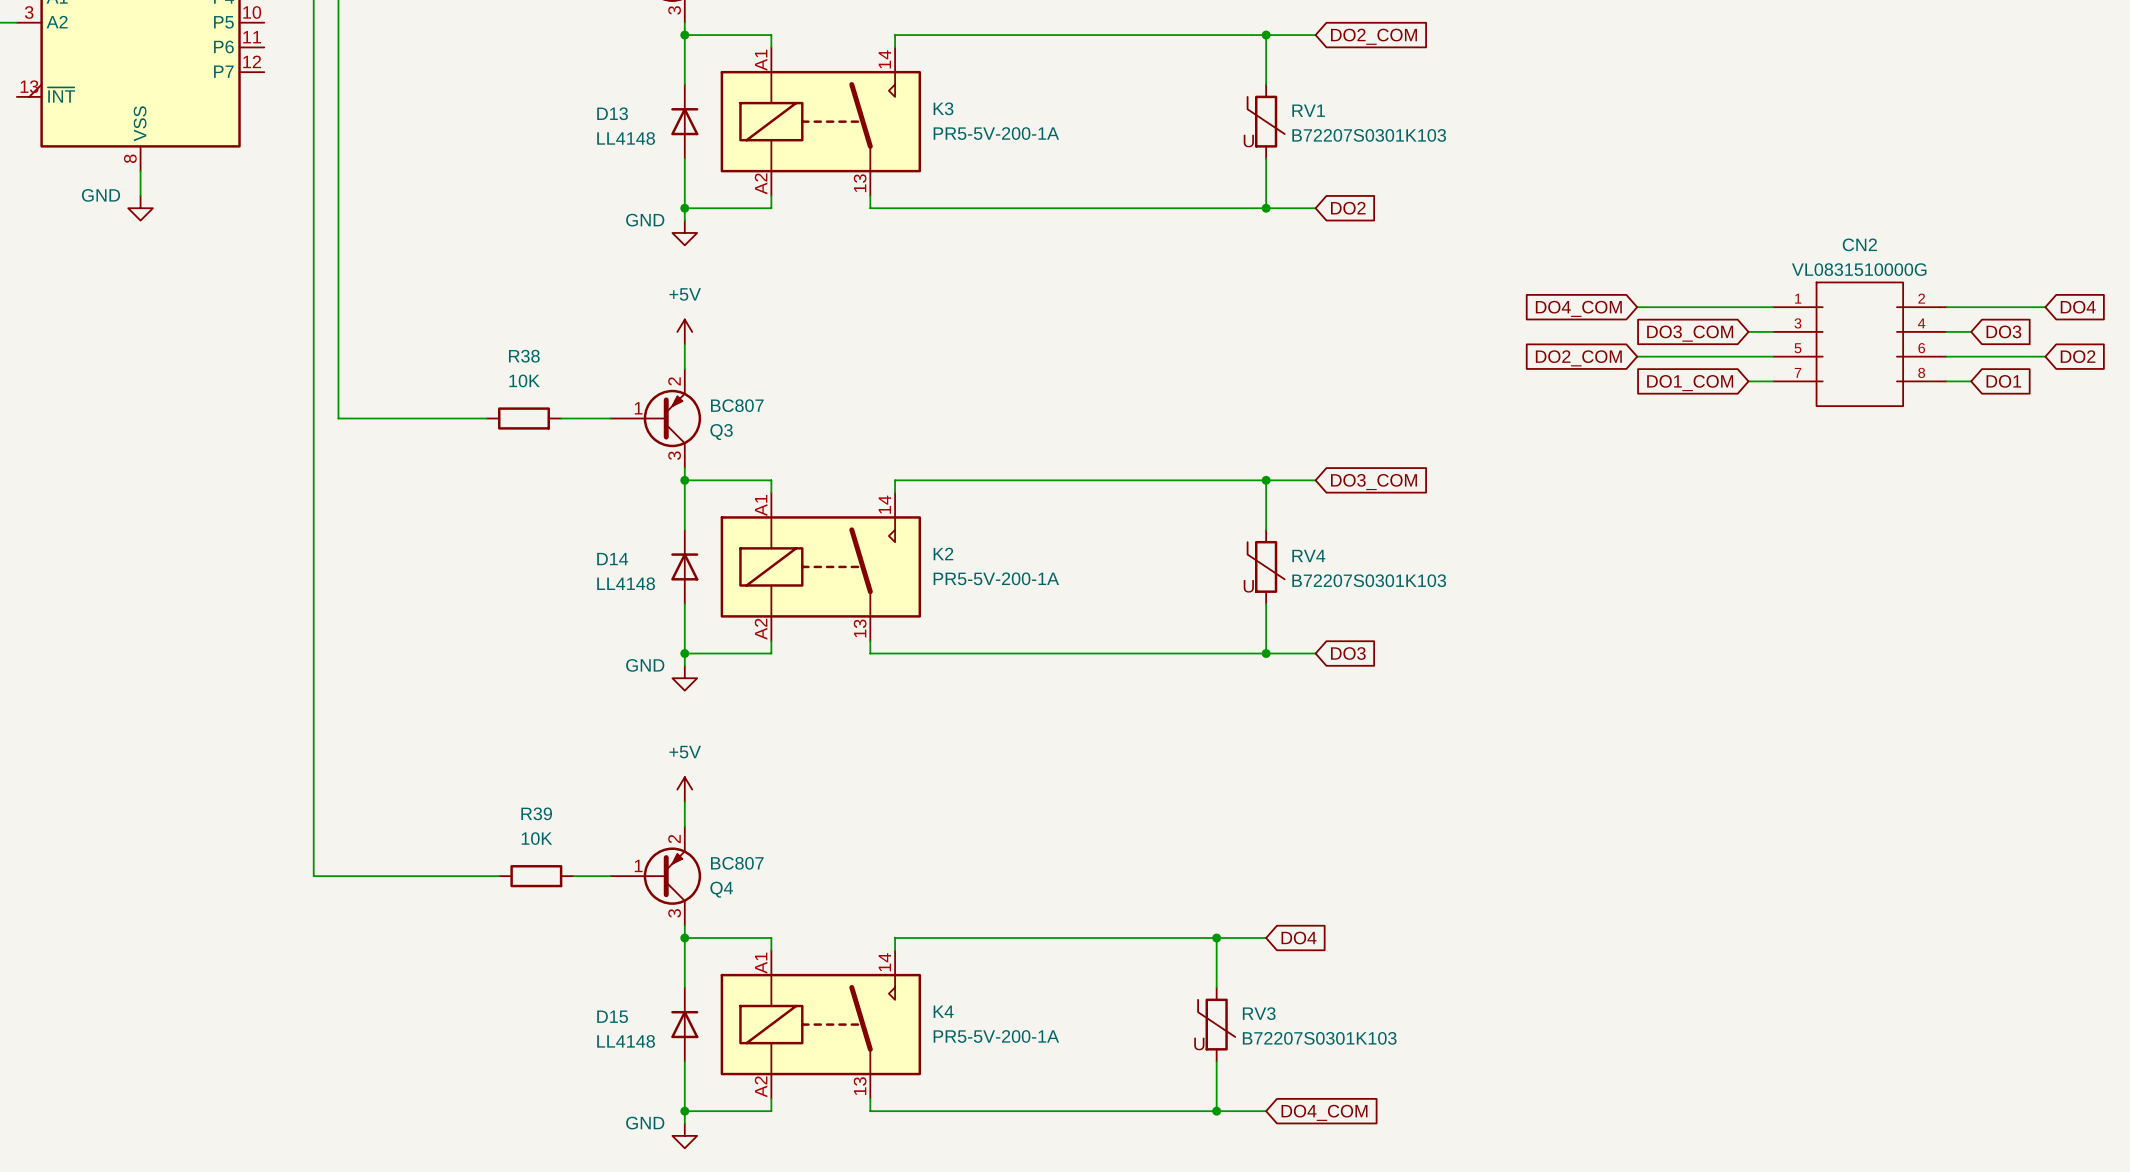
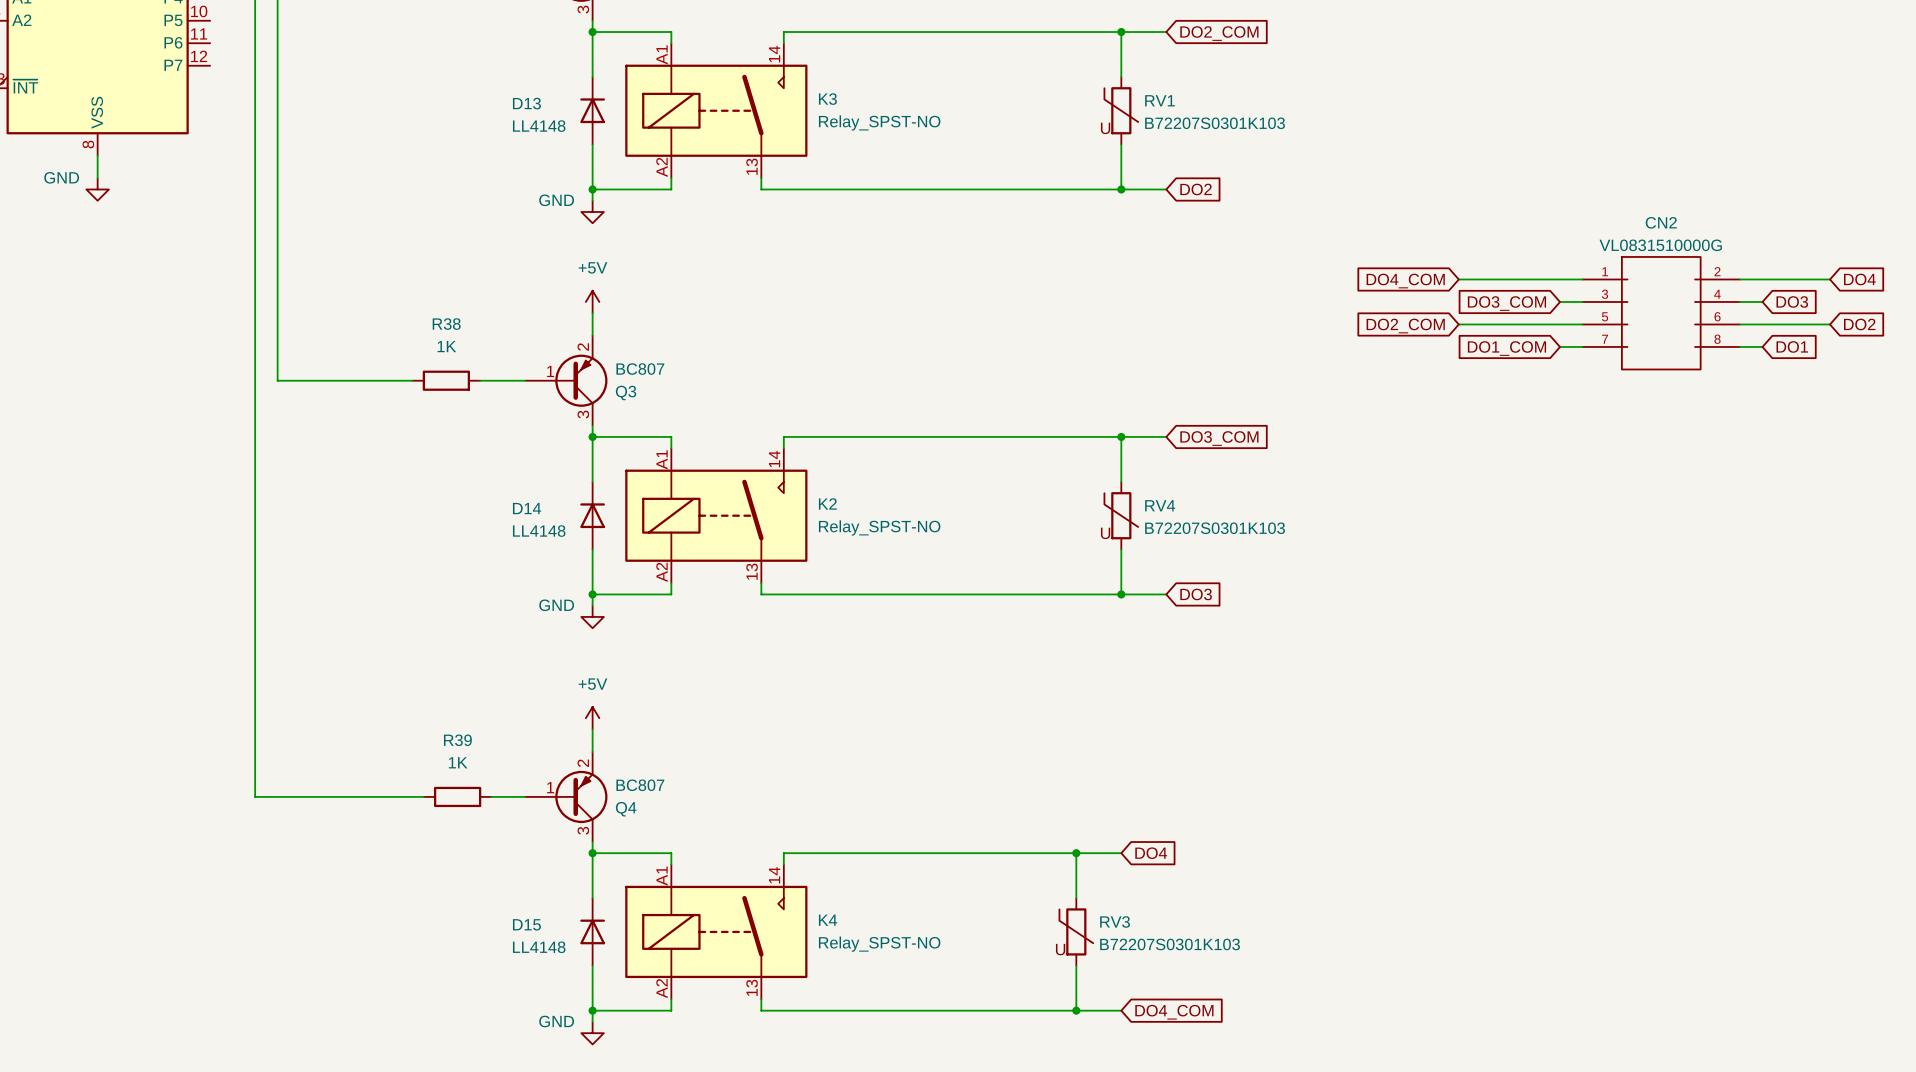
K3 value: PR5-5V-200-1A (996, 133) -> Relay_SPST-NO (879, 122)
R38 value: 10K (524, 380) -> 1K (446, 346)
K2 value: PR5-5V-200-1A (996, 578) -> Relay_SPST-NO (879, 527)
R39 value: 10K (536, 838) -> 1K (458, 762)
K4 value: PR5-5V-200-1A (996, 1036) -> Relay_SPST-NO (879, 944)

